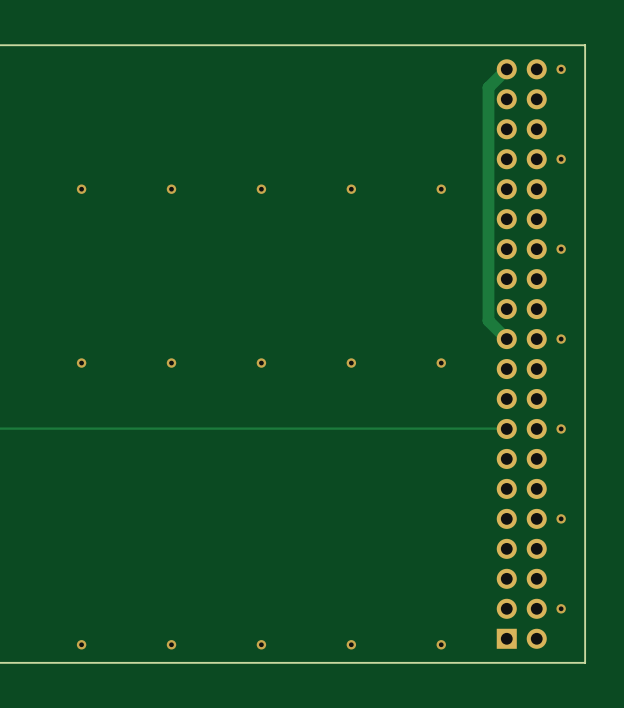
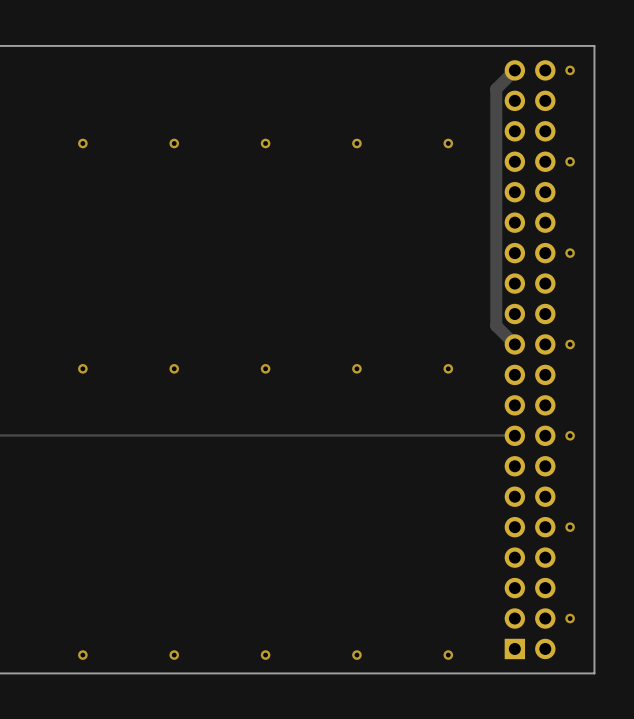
via position: (81, 189) -> (82, 143)
via position: (171, 189) -> (174, 143)
via position: (261, 189) -> (265, 143)
via position: (351, 189) -> (356, 143)
via position: (441, 189) -> (448, 143)

